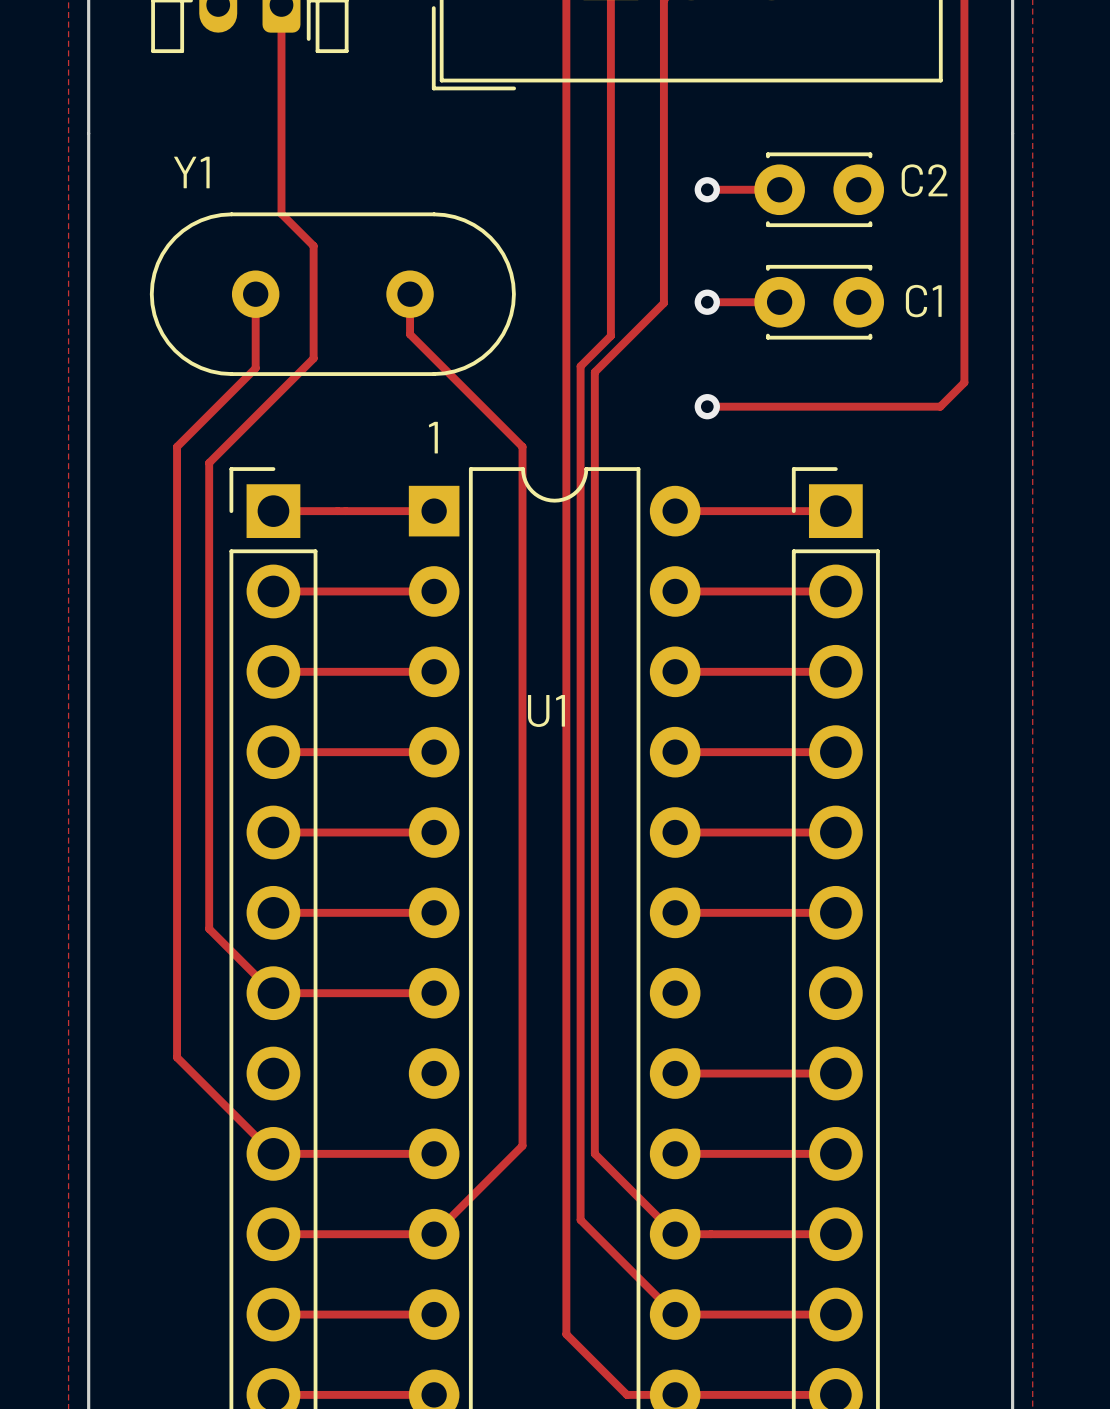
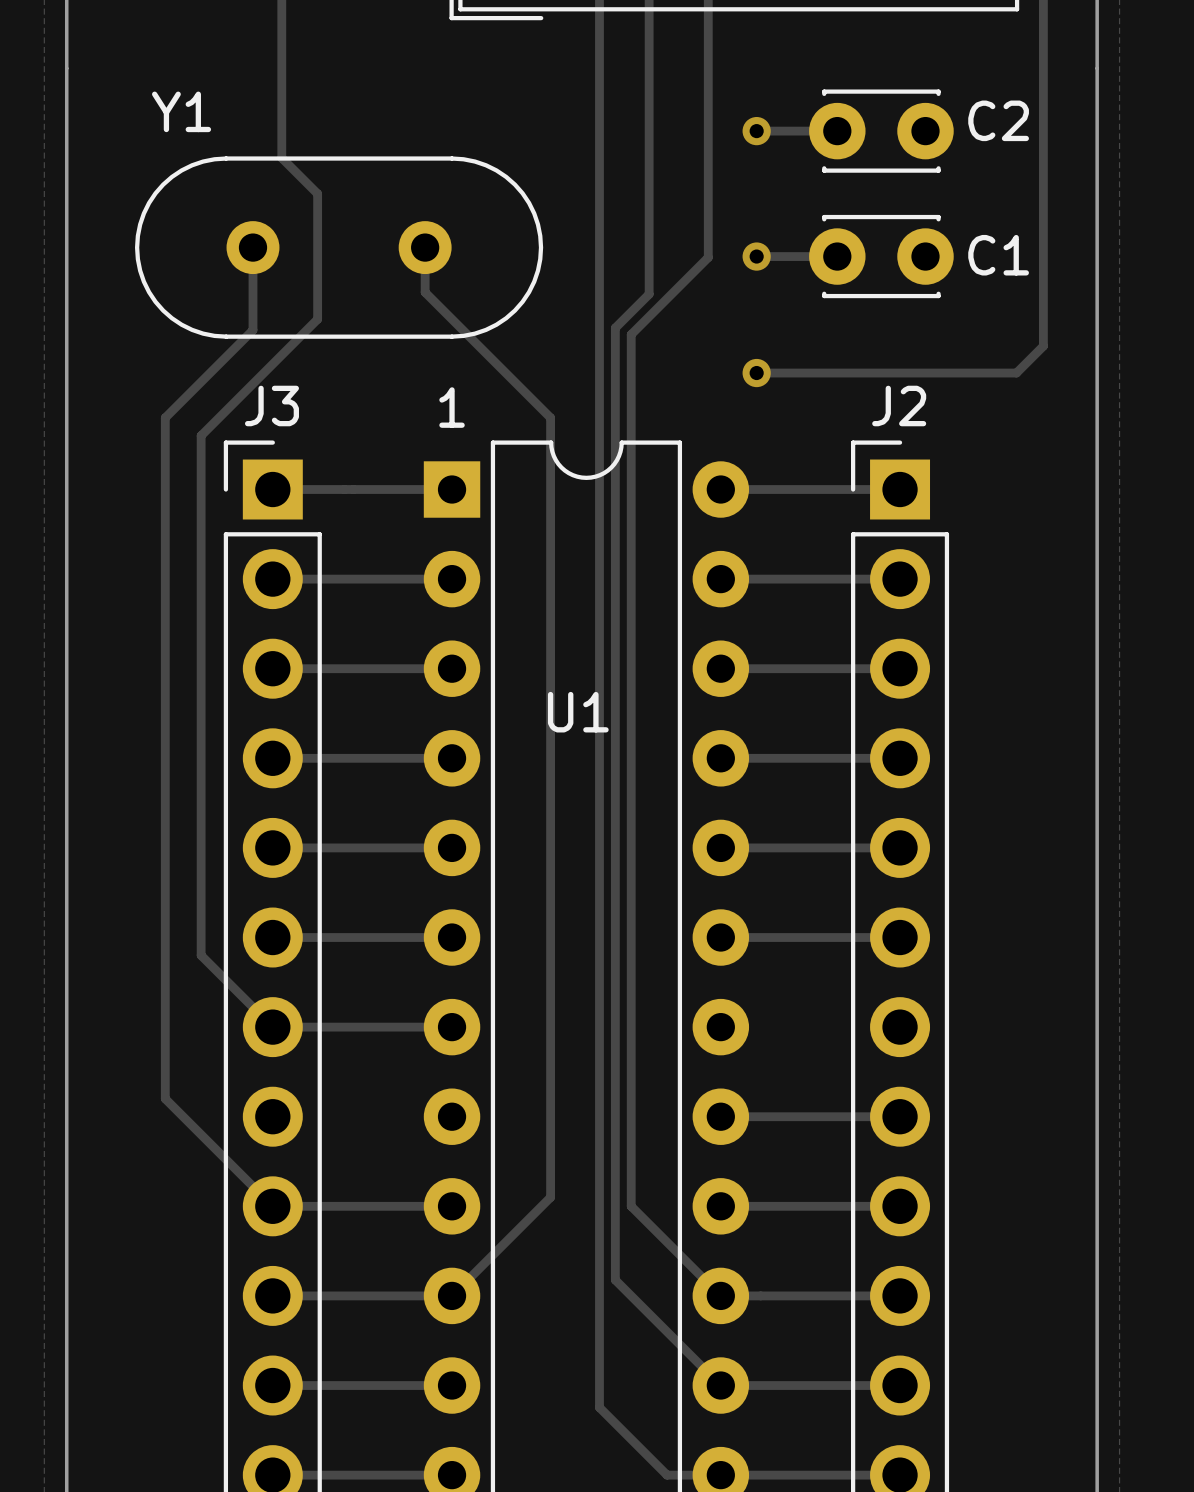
J3 name: none -> J3 (271, 406)
J2 name: none -> J2 (899, 406)

